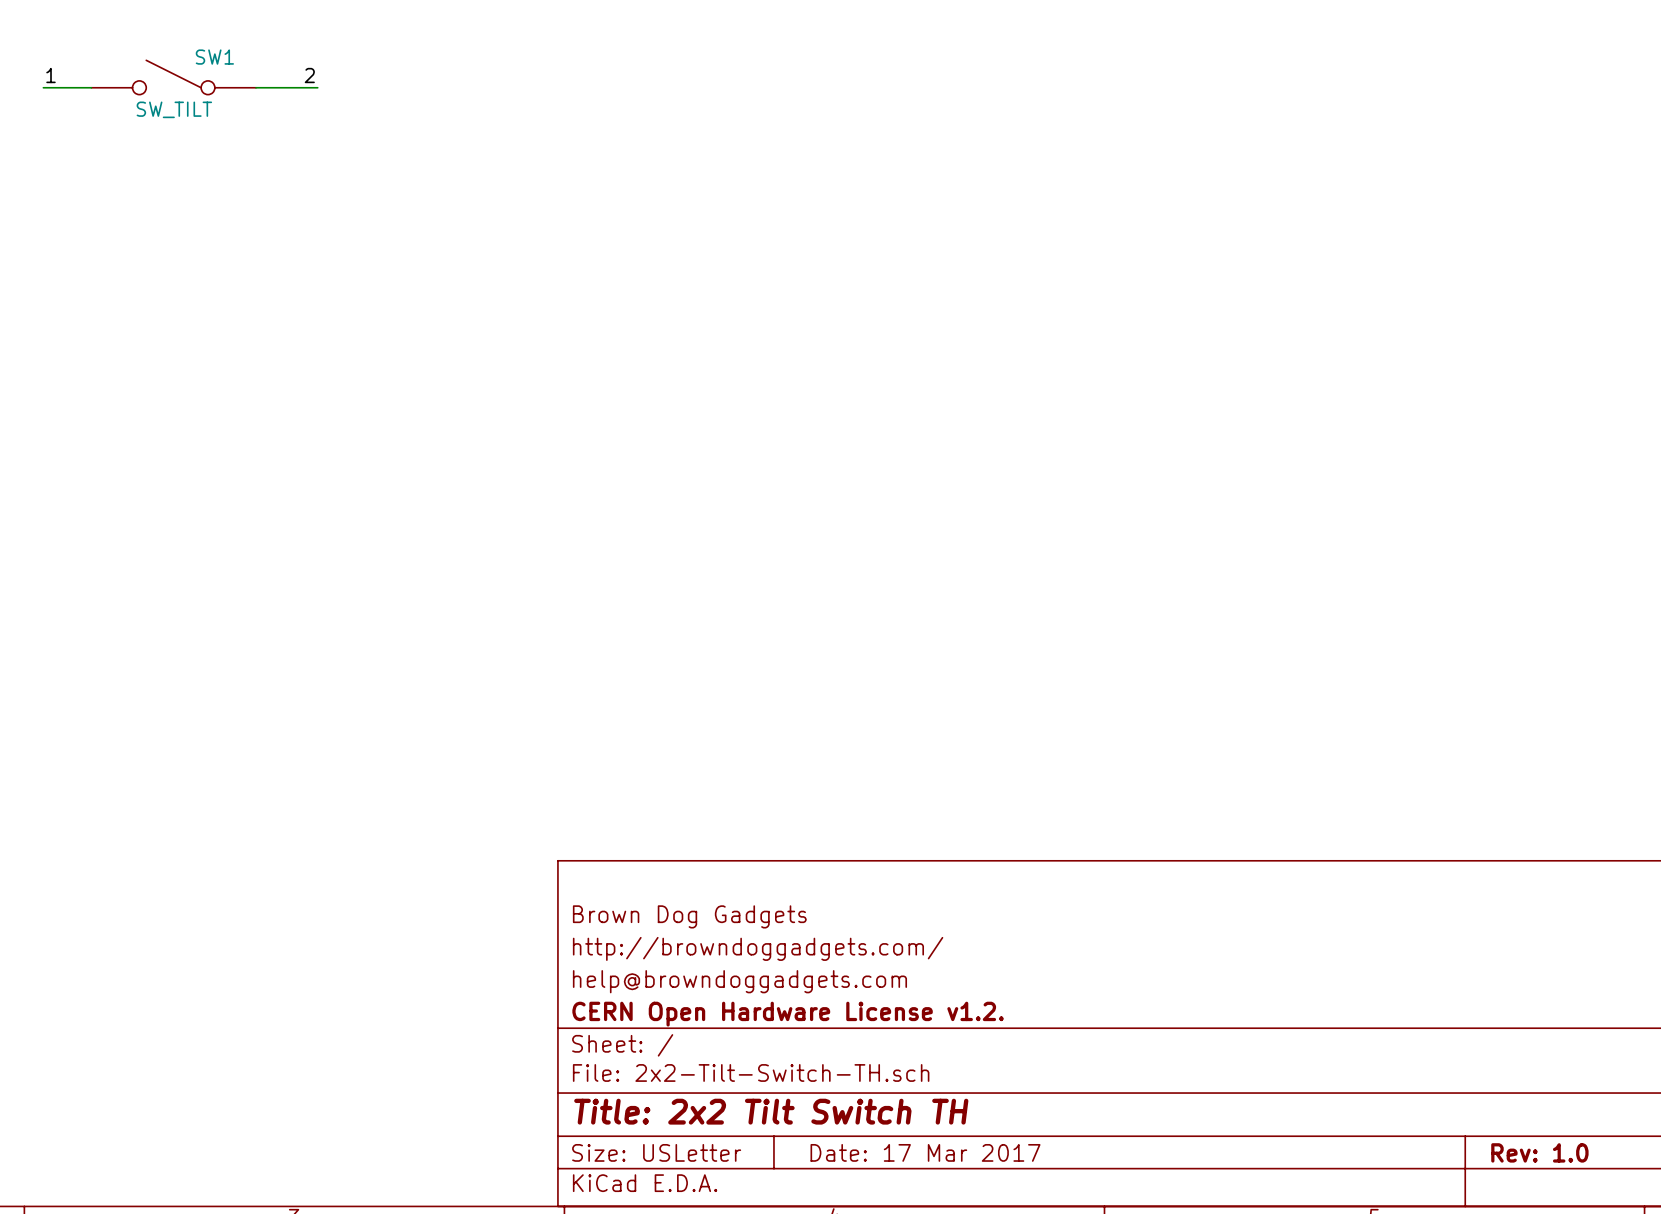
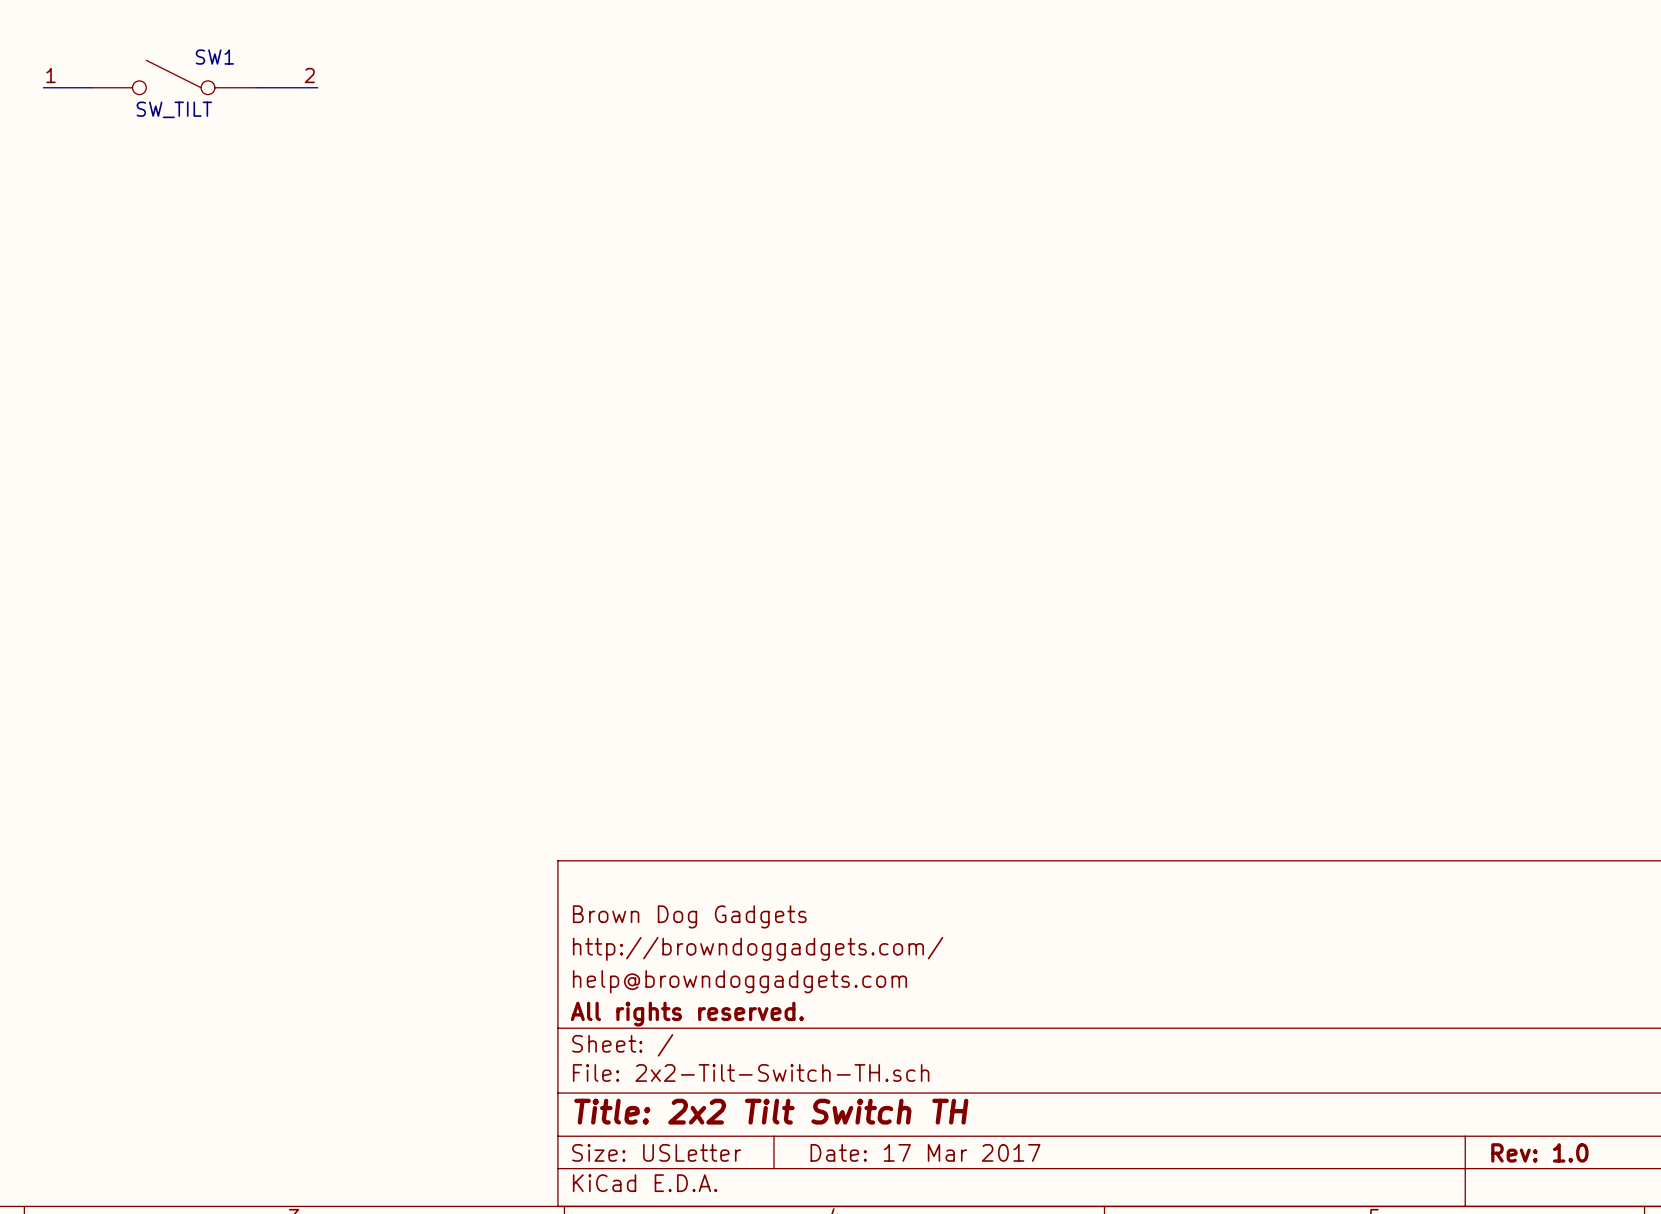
title block: CERN Open Hardware License v1.2. (788, 1014) -> All rights reserved. (687, 1014)

